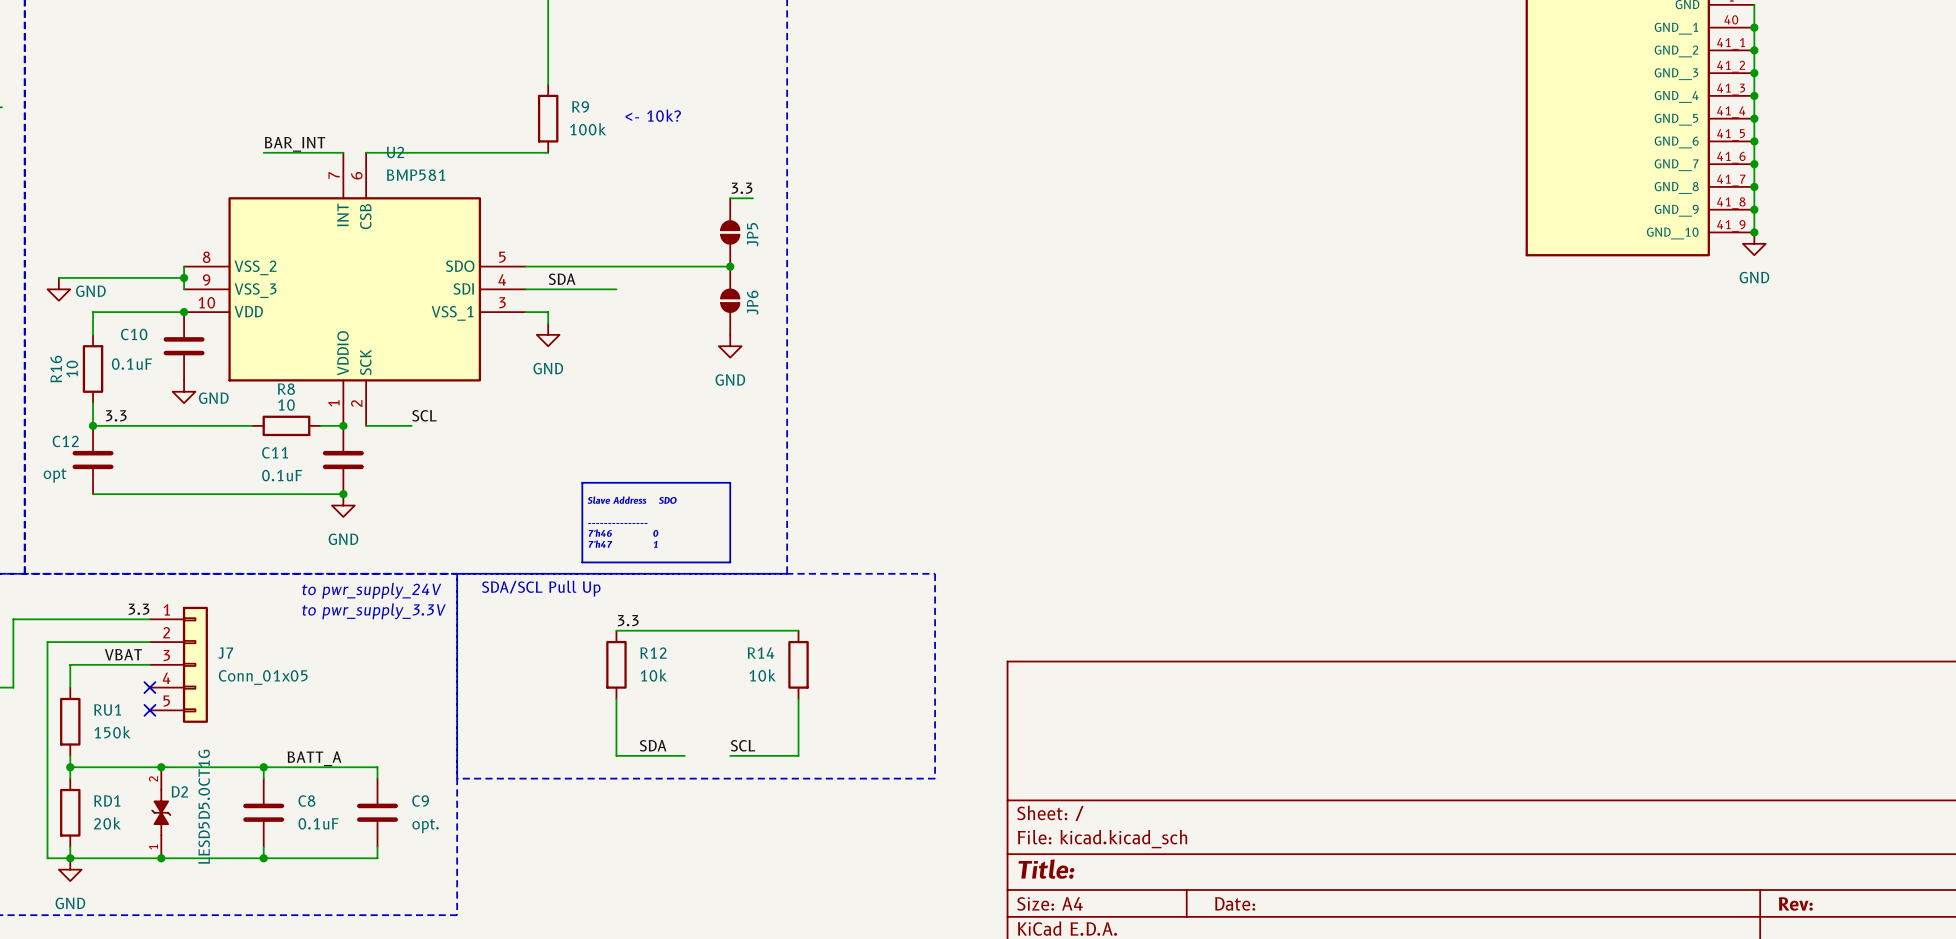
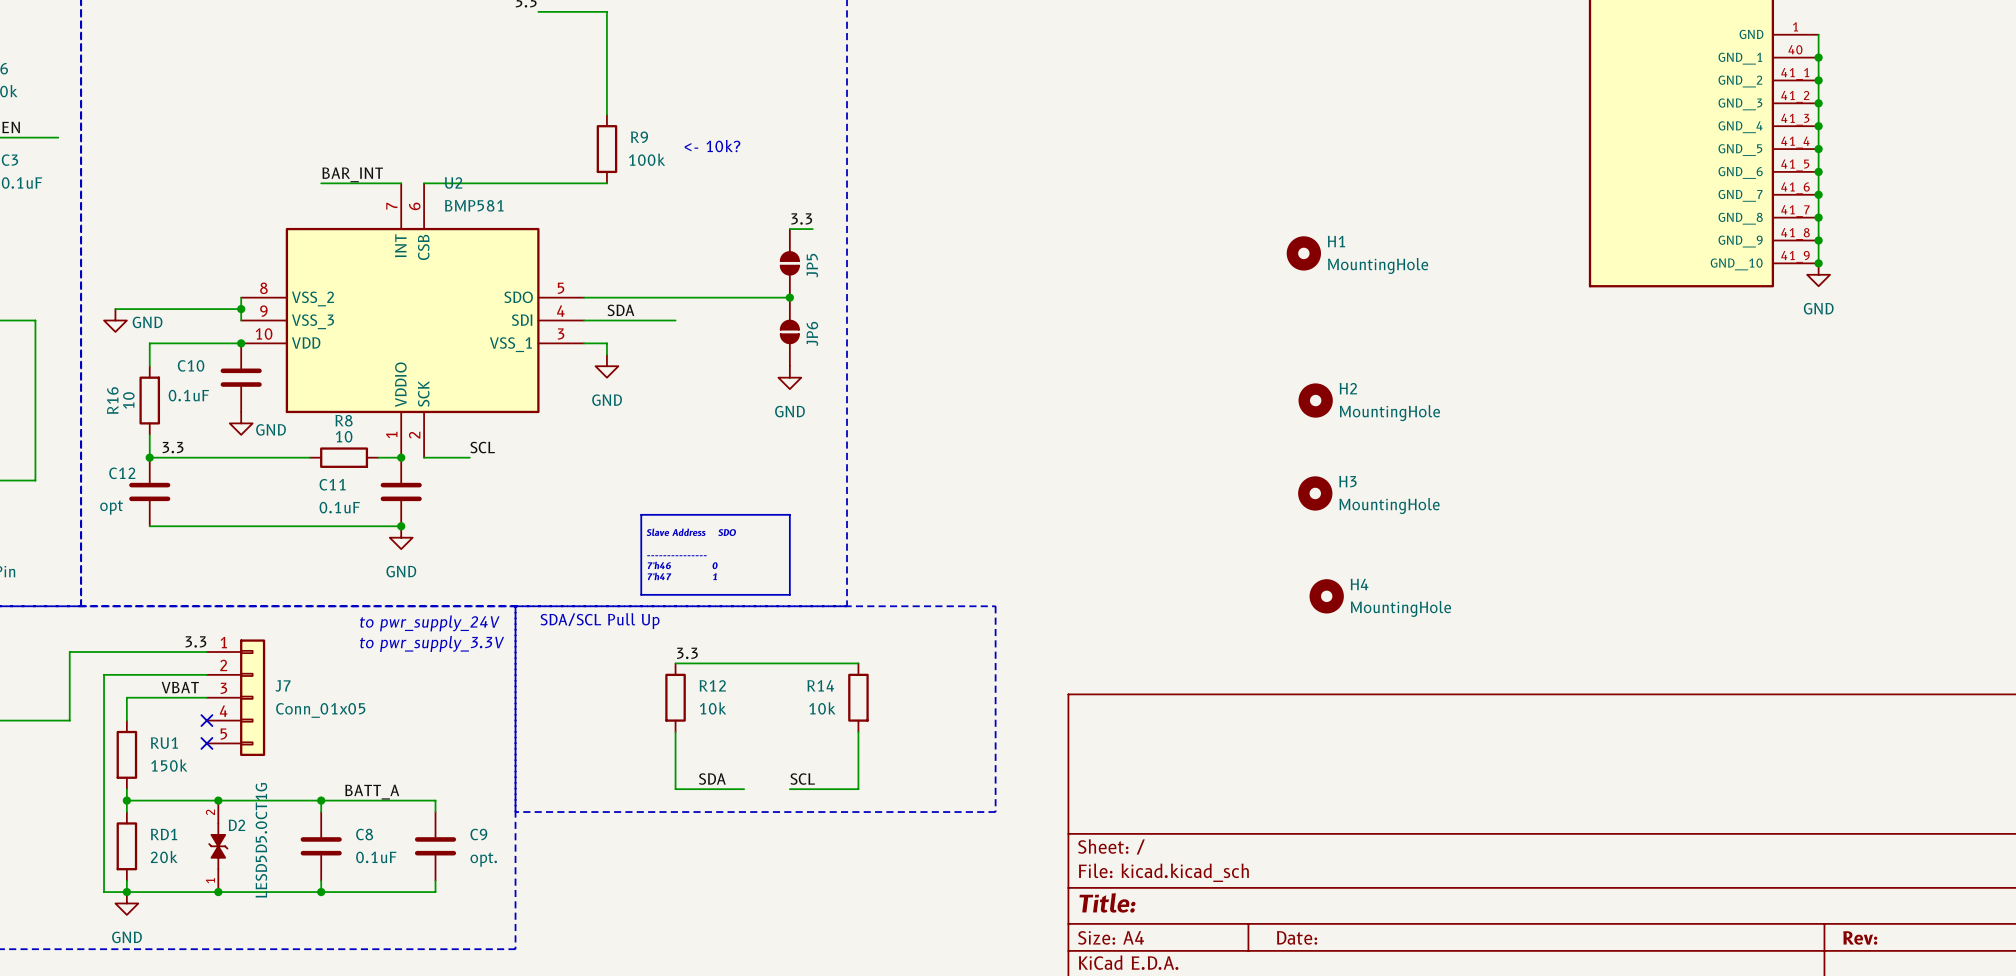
H1: none -> MountingHole (1303, 253)
H2: none -> MountingHole (1315, 400)
H3: none -> MountingHole (1315, 493)
H4: none -> MountingHole (1326, 596)

